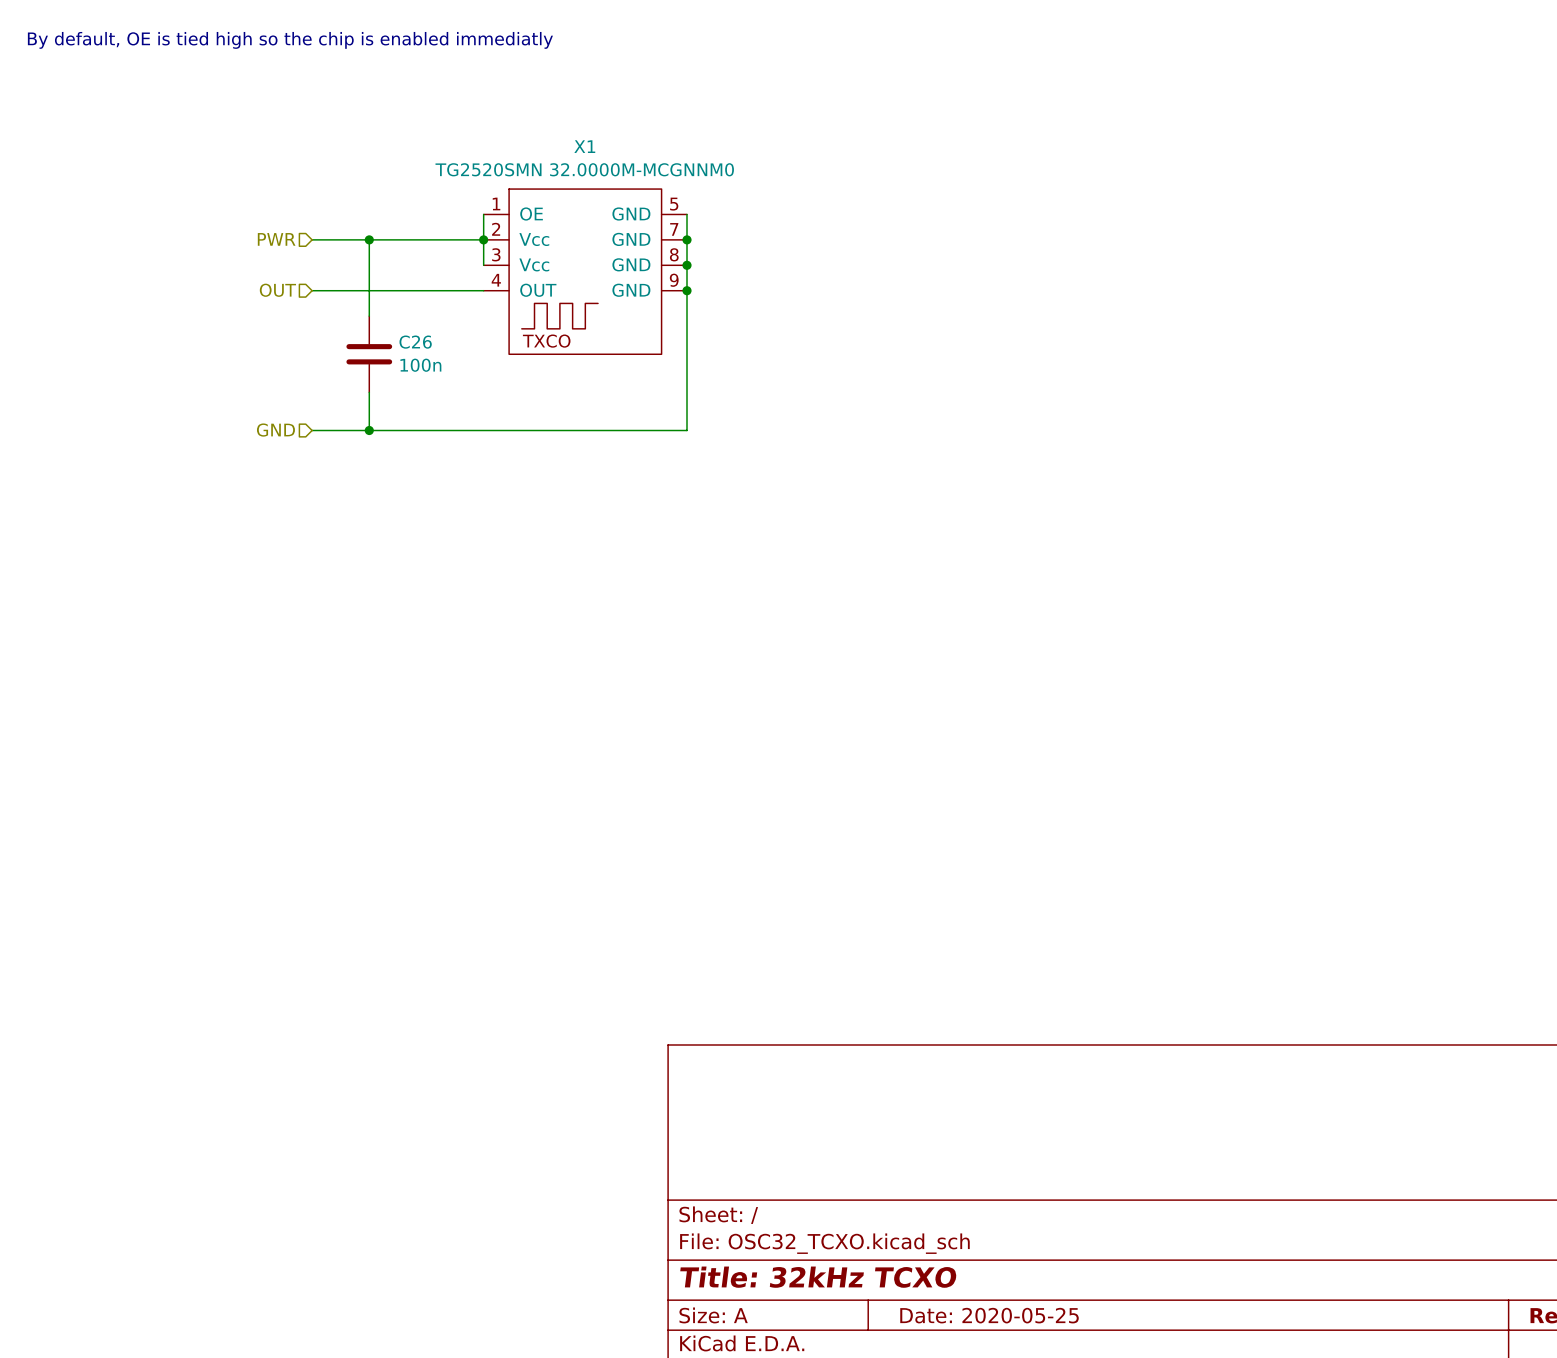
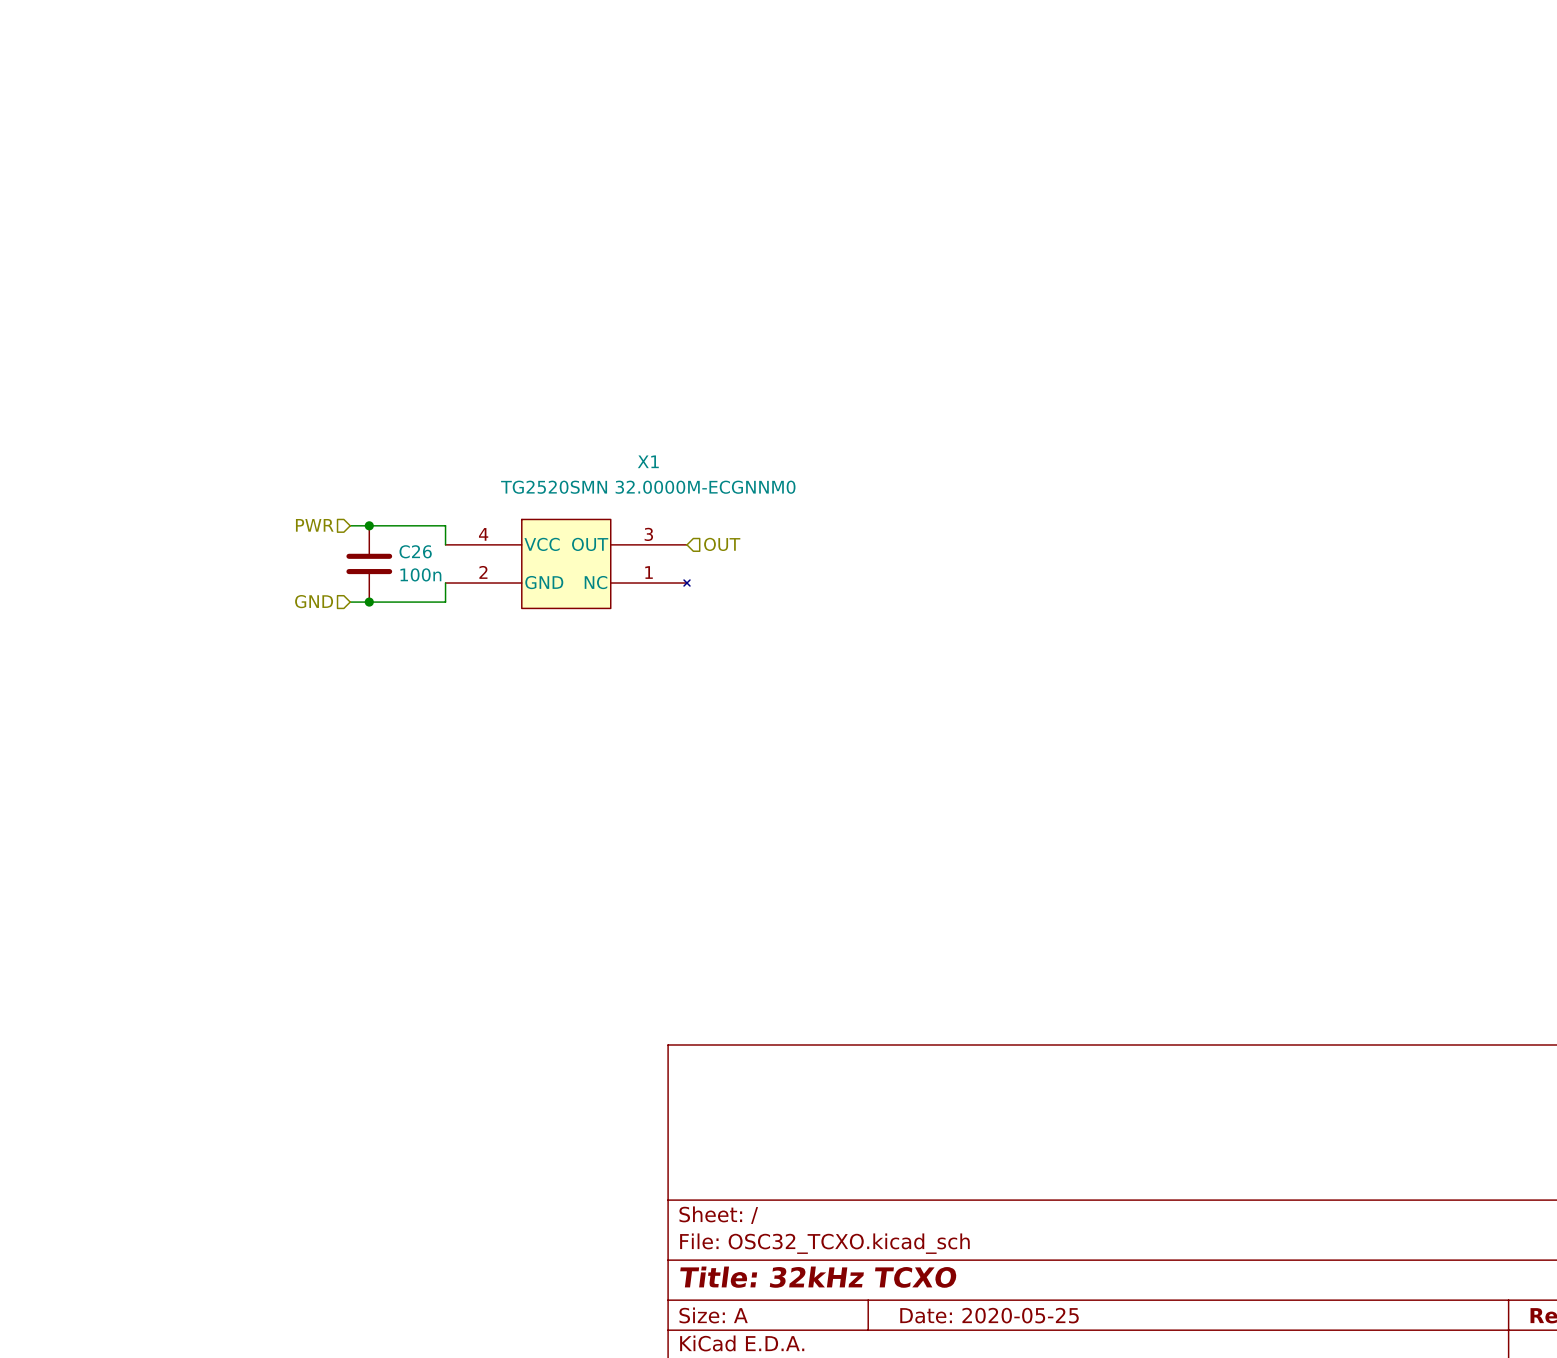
text: By default, OE is tied high so the chip is enabled immediatly (290, 40) -> none
X1 name position: X1 (584, 146) -> X1 (648, 461)
X1 value: TG2520SMN 32.0000M-MCGNNM0 (584, 169) -> TG2520SMN 32.0000M-ECGNNM0 (648, 487)
X1 symbol: [483, 189, 687, 355] -> [445, 519, 691, 609]
wire: (483, 214) (483, 265) -> none
wire: (686, 214) (686, 430) (312, 430) -> none
hierarchical label: PWR (276, 239) -> none
wire: (312, 239) (483, 239) -> none
wire: (369, 239) (369, 316) -> none
junction: (369, 239) -> none
junction: (483, 239) -> none
junction: (686, 239) -> none
junction: (686, 265) -> none
hierarchical label: OUT (277, 290) -> none
wire: (312, 290) (483, 290) -> none
junction: (686, 290) -> none
C26 position: (369, 354) -> (369, 563)
wire: (369, 392) (369, 430) -> none
hierarchical label position: GND (275, 430) -> GND (314, 601)
junction: (369, 430) -> none
hierarchical label: none -> PWR (314, 525)
wire: none -> (350, 525) (445, 525) (445, 544)
junction: none -> (369, 525)
hierarchical label: none -> OUT (722, 544)
wire: none -> (445, 583) (445, 602) (350, 602)
junction: none -> (369, 602)

